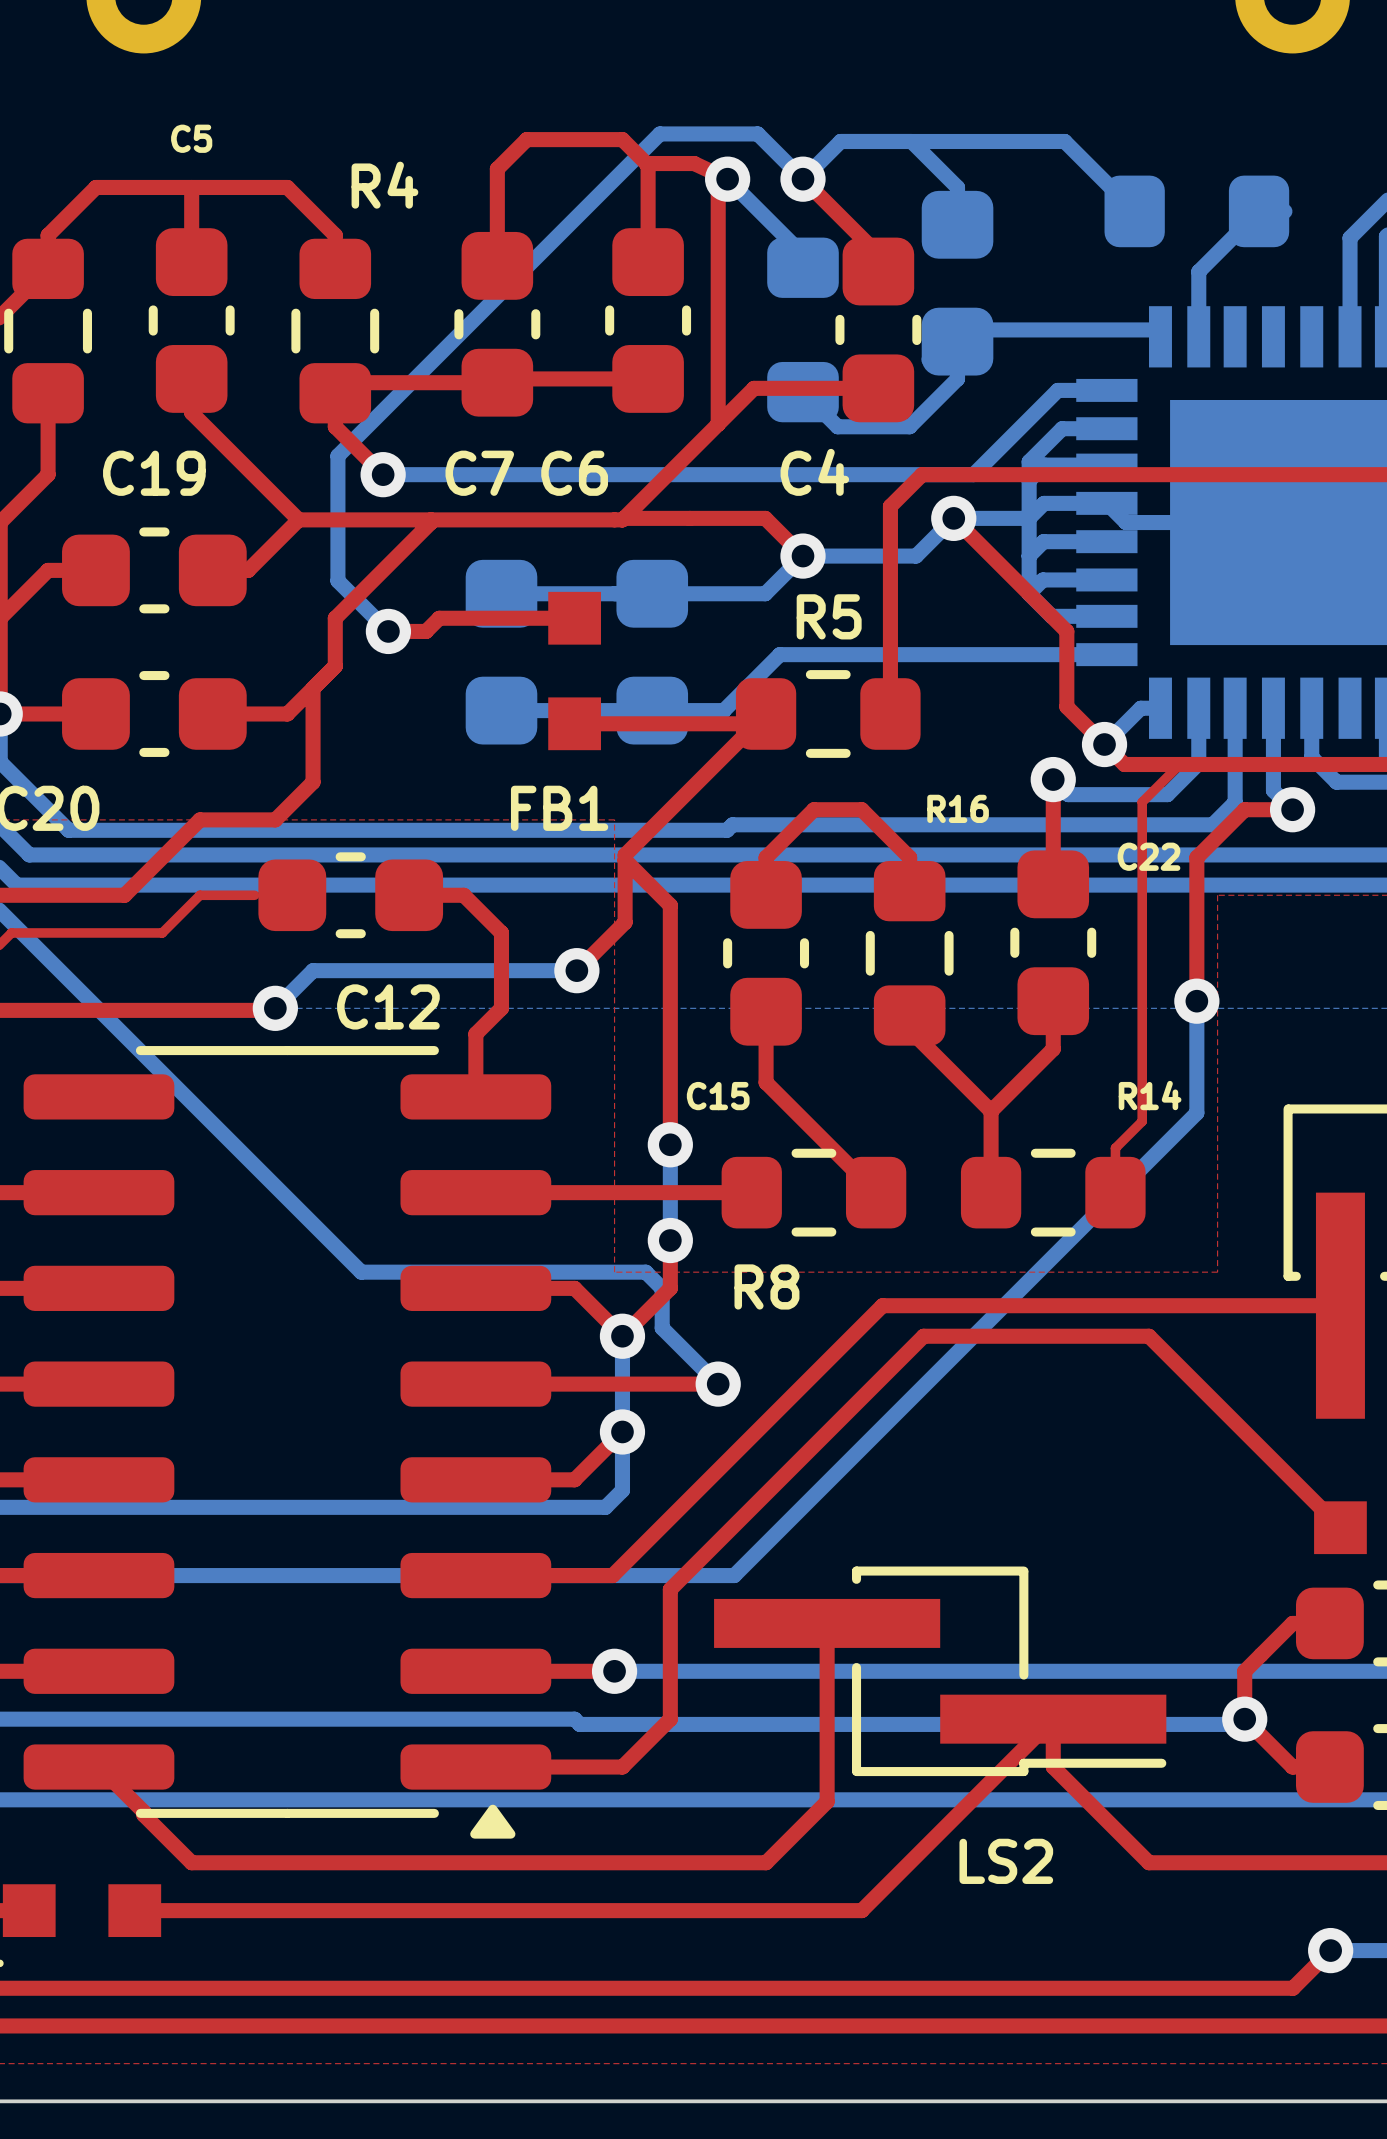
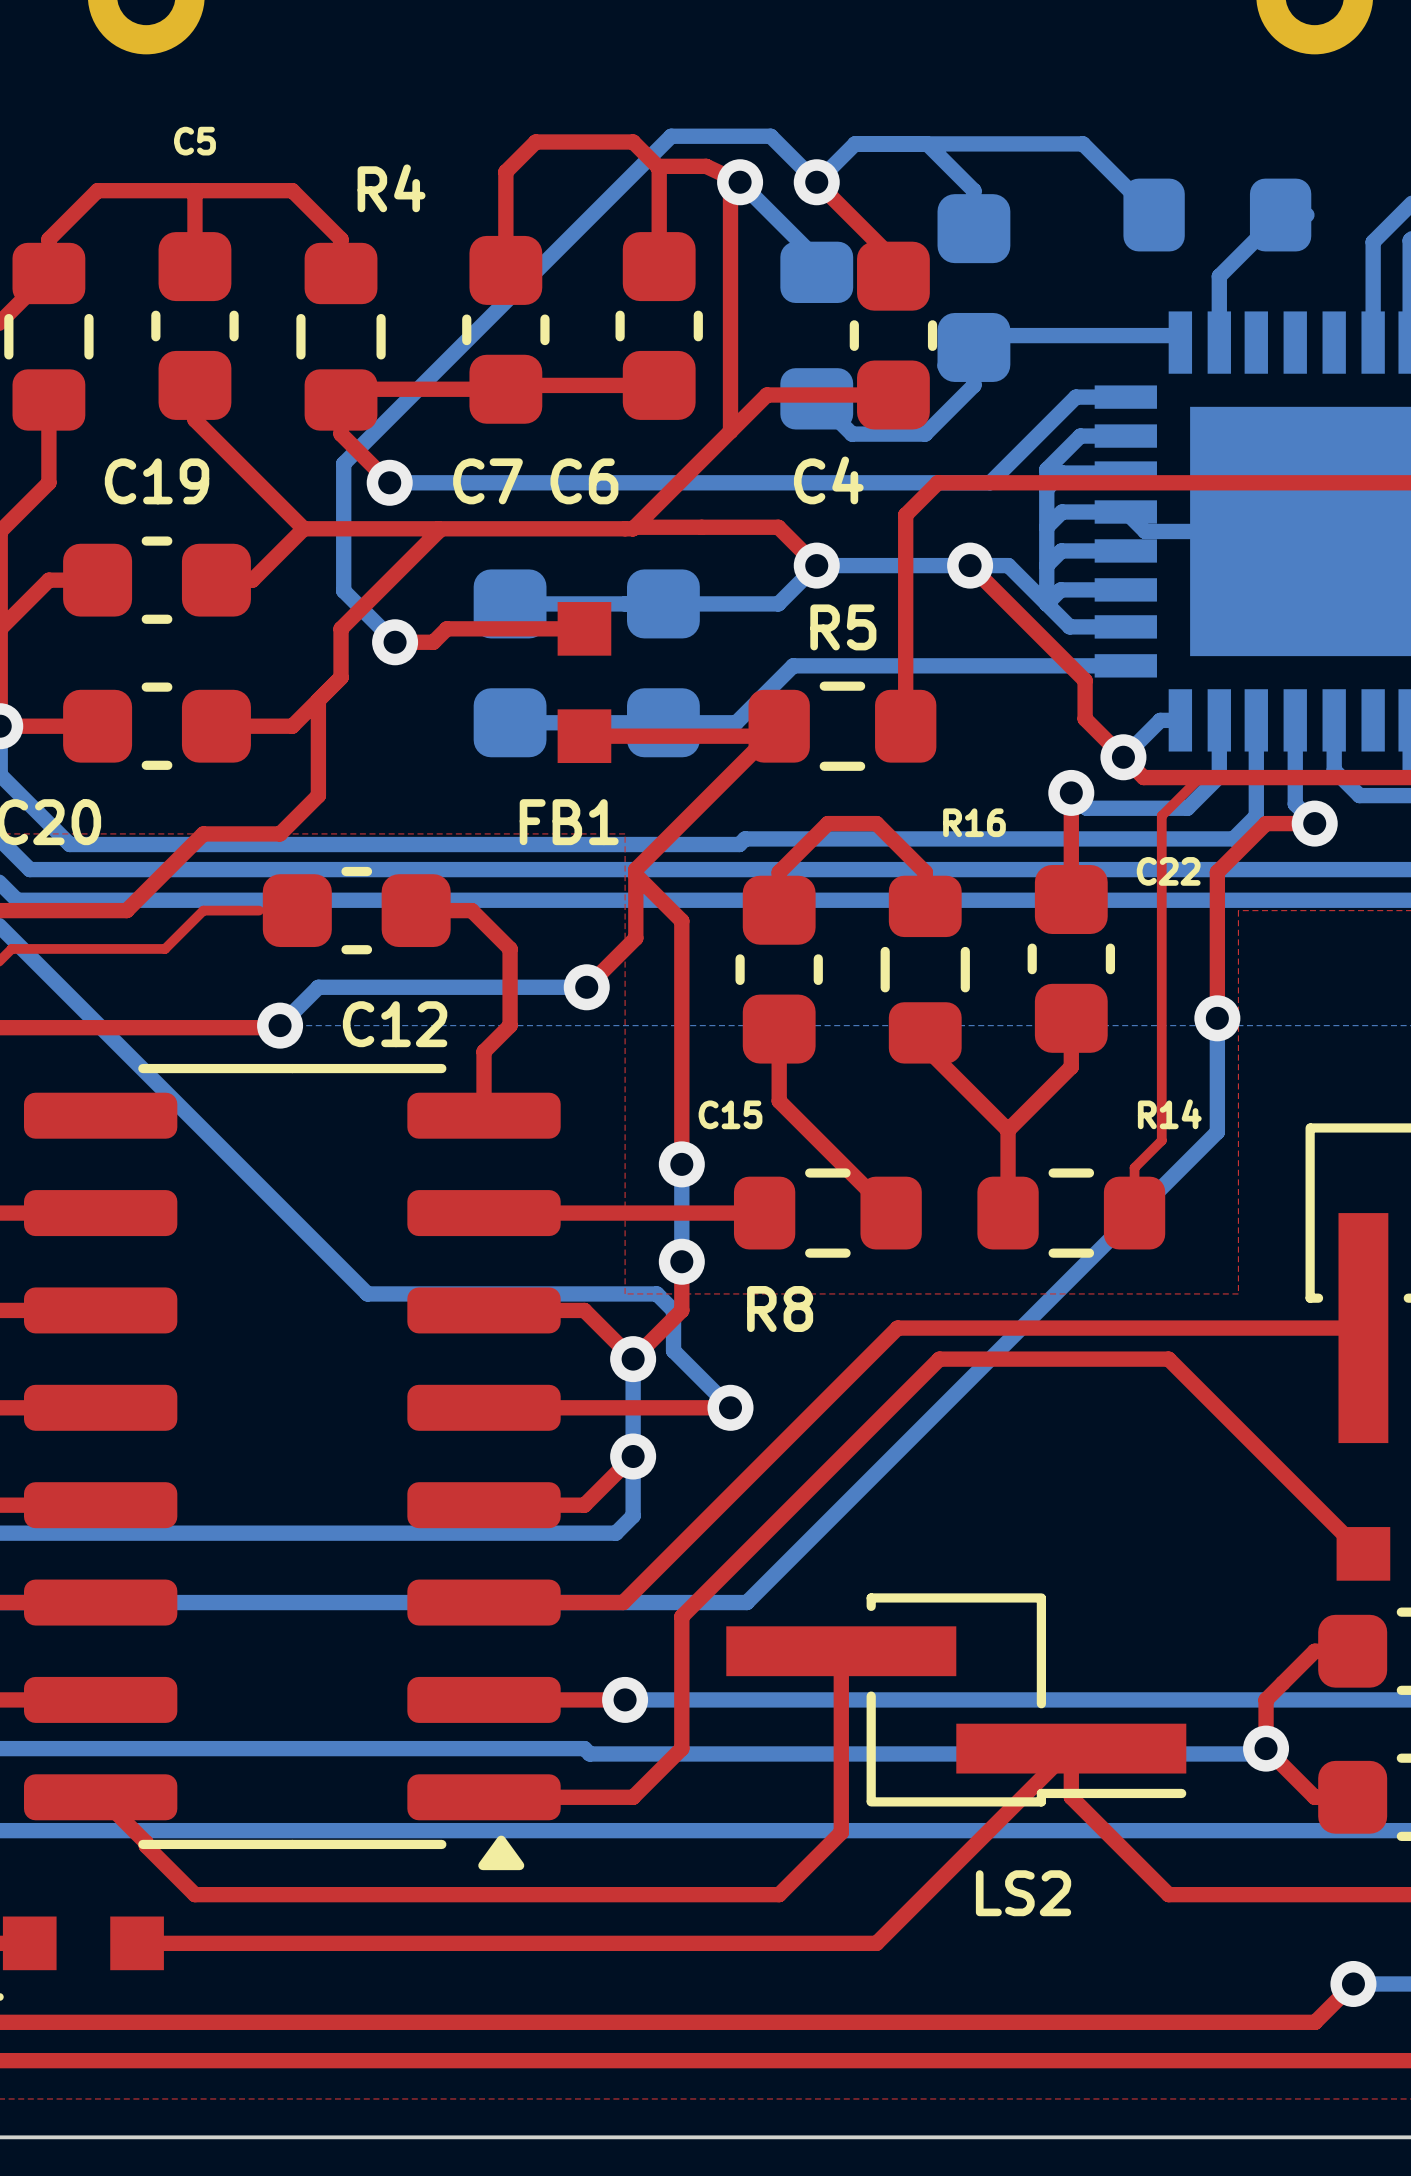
top track: (953, 518) (1066, 631) (1066, 669) -> (970, 565) (1085, 680)
via position: (953, 518) -> (970, 565)
bottom track: (1029, 518) (953, 518) (916, 556) -> (1046, 603) (1008, 565) (931, 565)

